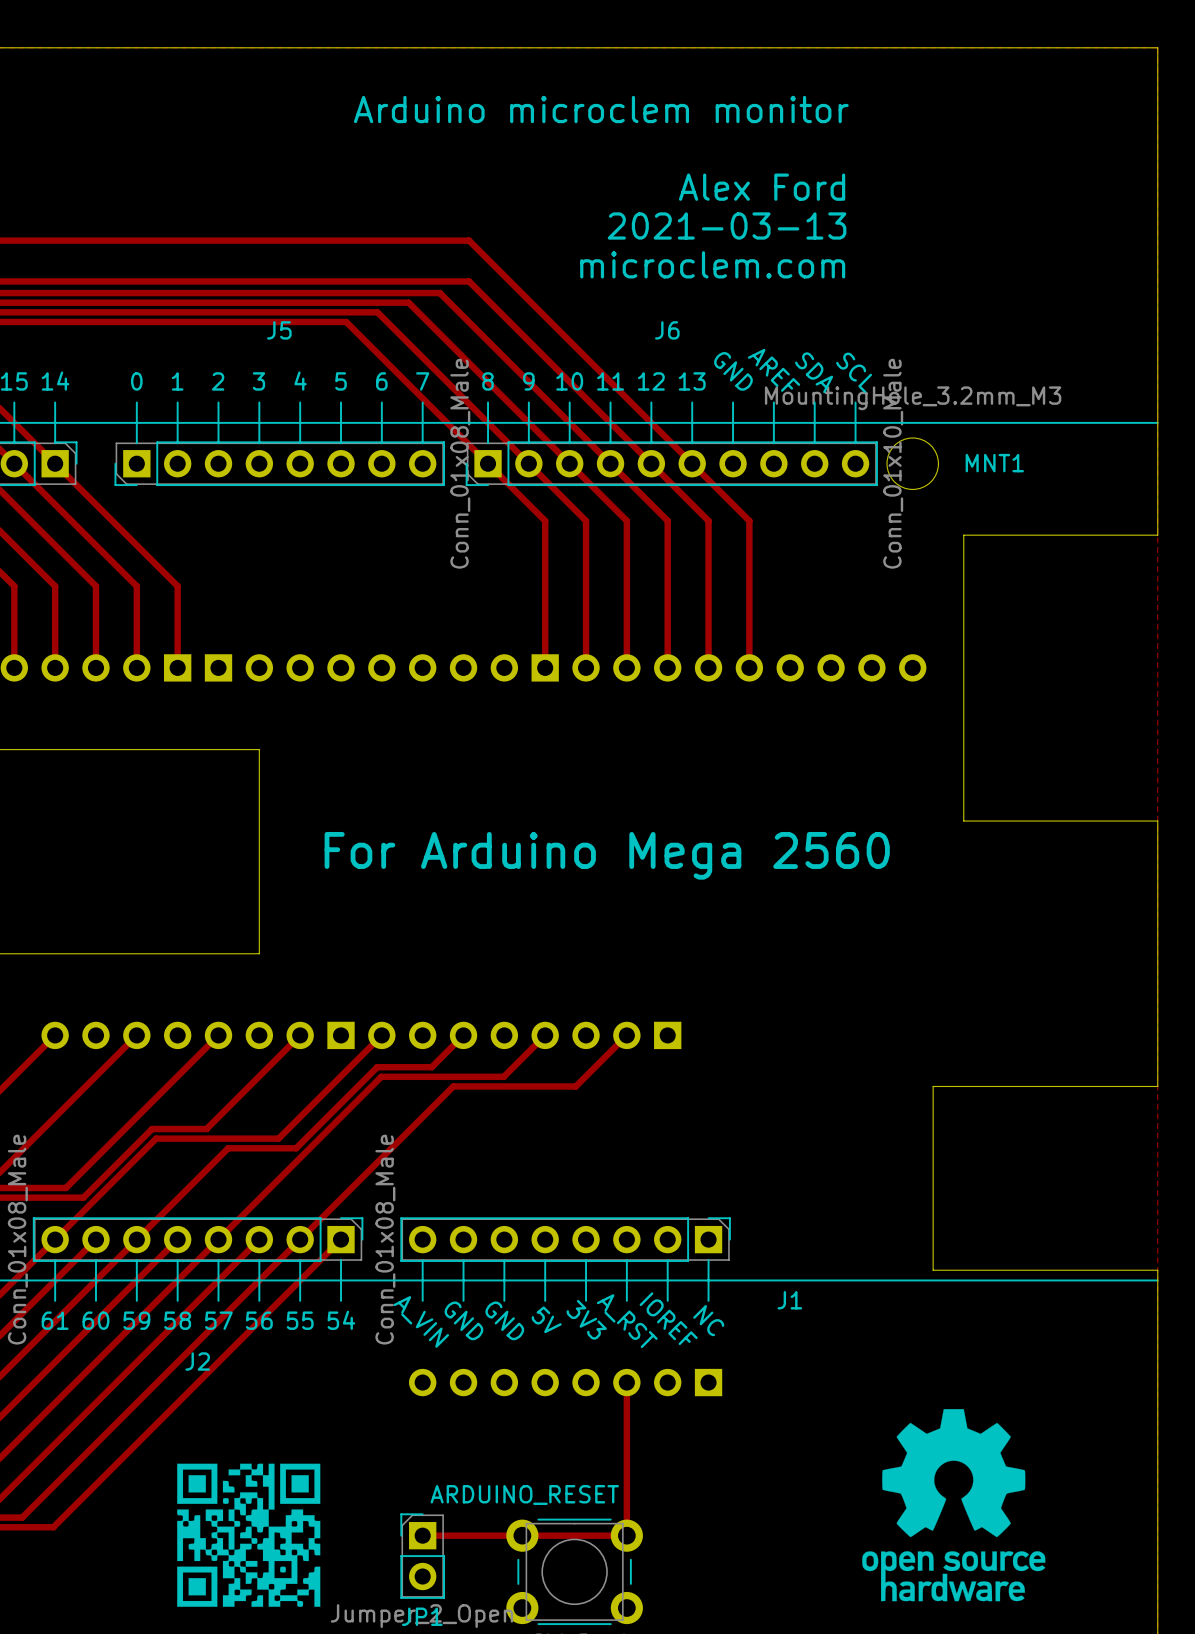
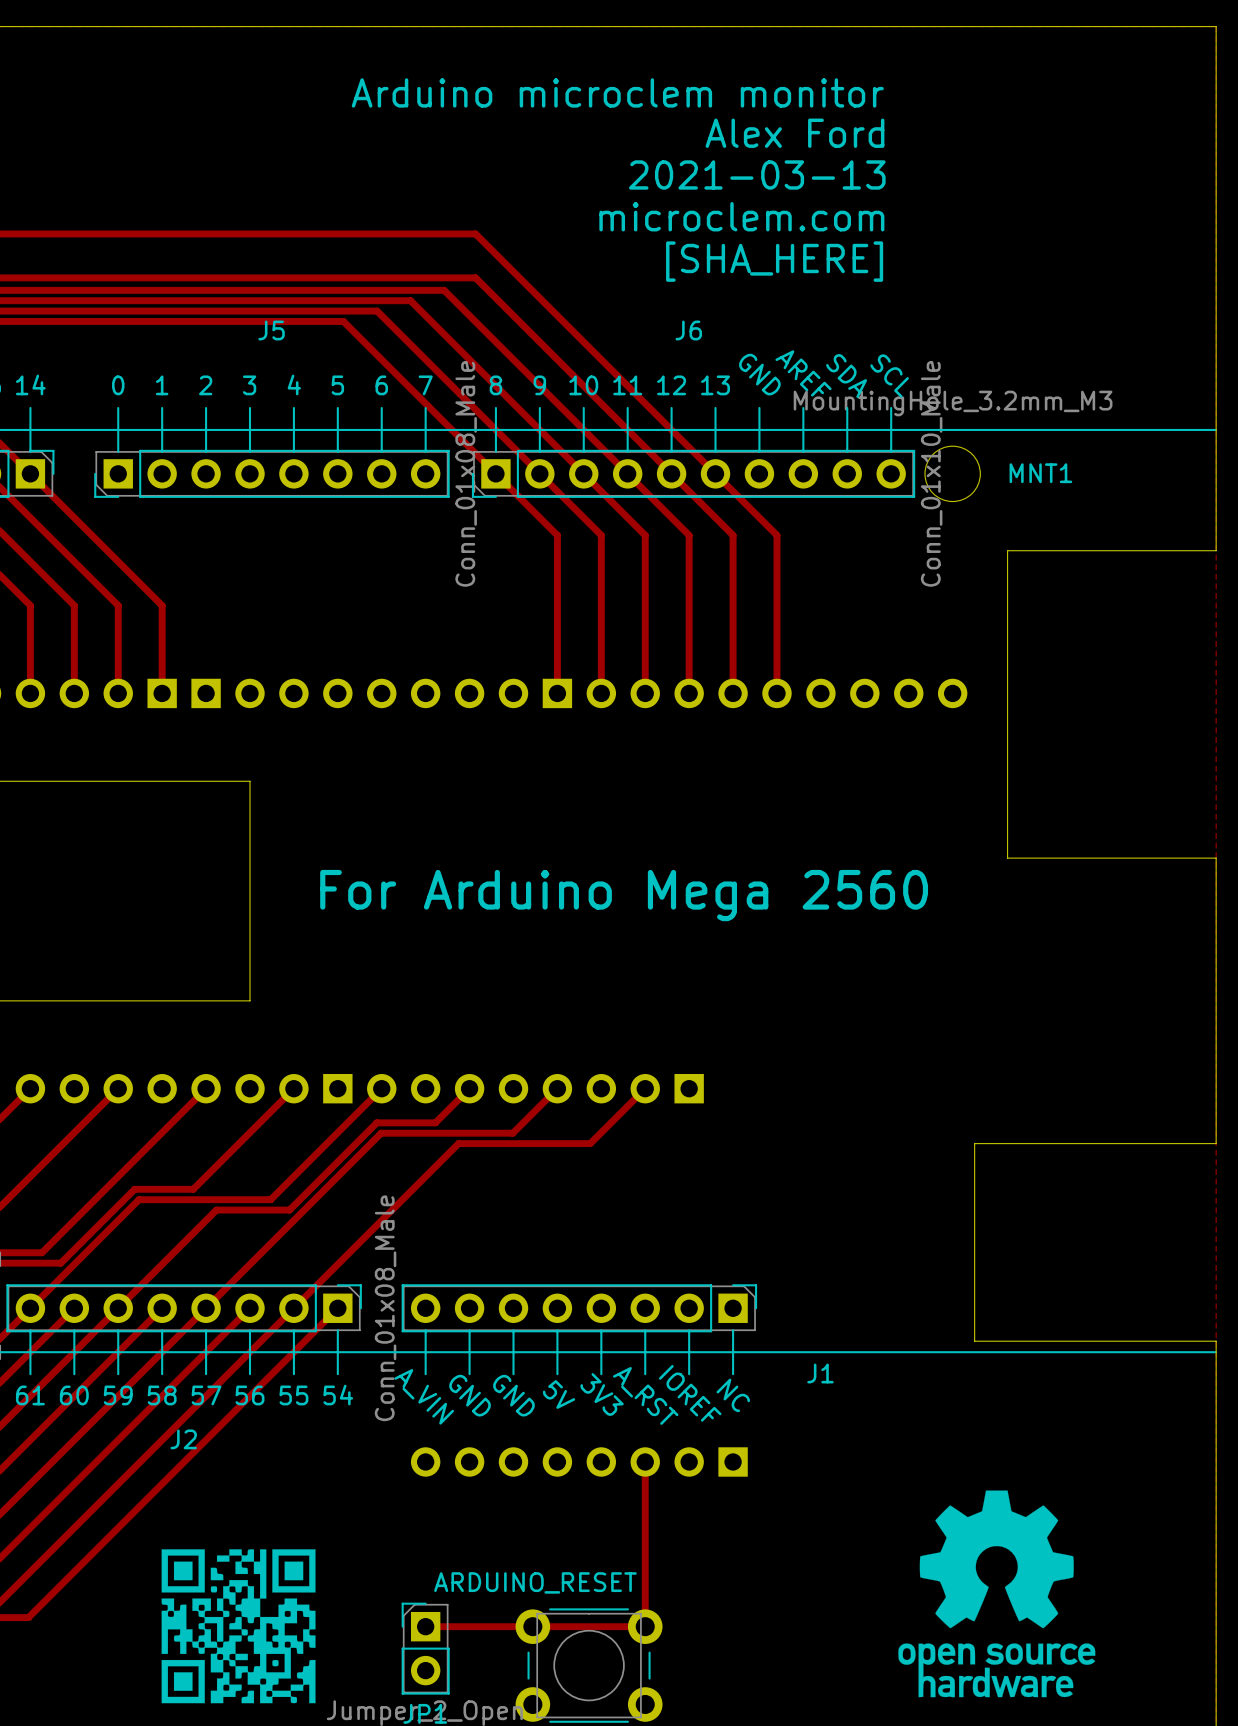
text: none -> Alex Ford (794, 133)
text: Alex Ford (762, 187) -> 2021-03-13 (757, 174)
text: 2021-03-13 (727, 225) -> microclem.com (741, 216)
text: microclem.com (712, 264) -> [SHA_HERE] (774, 261)

